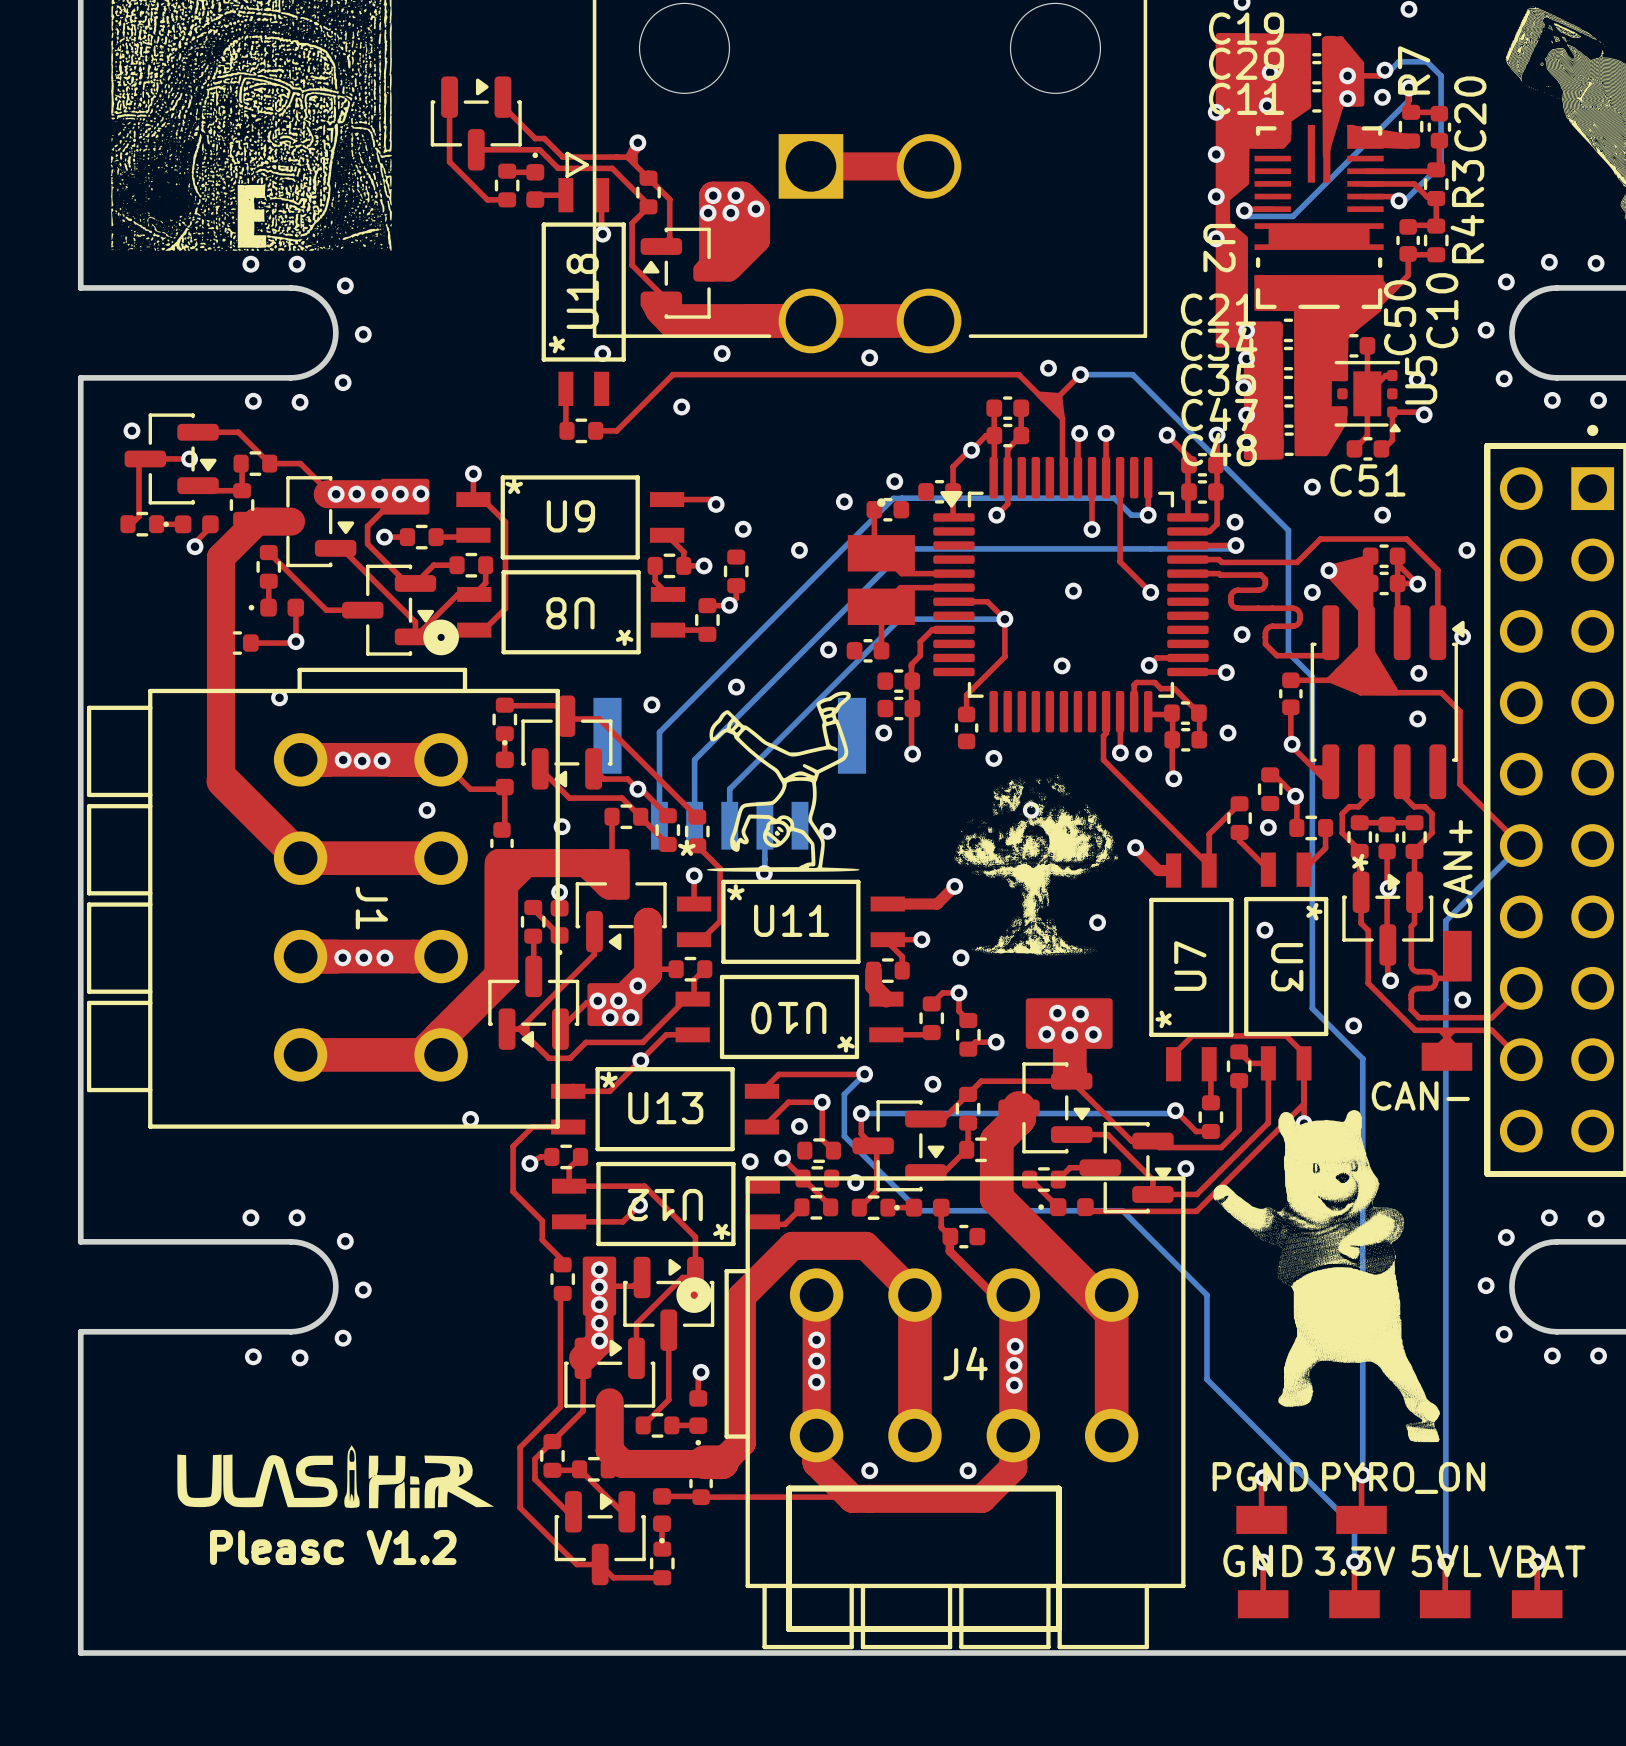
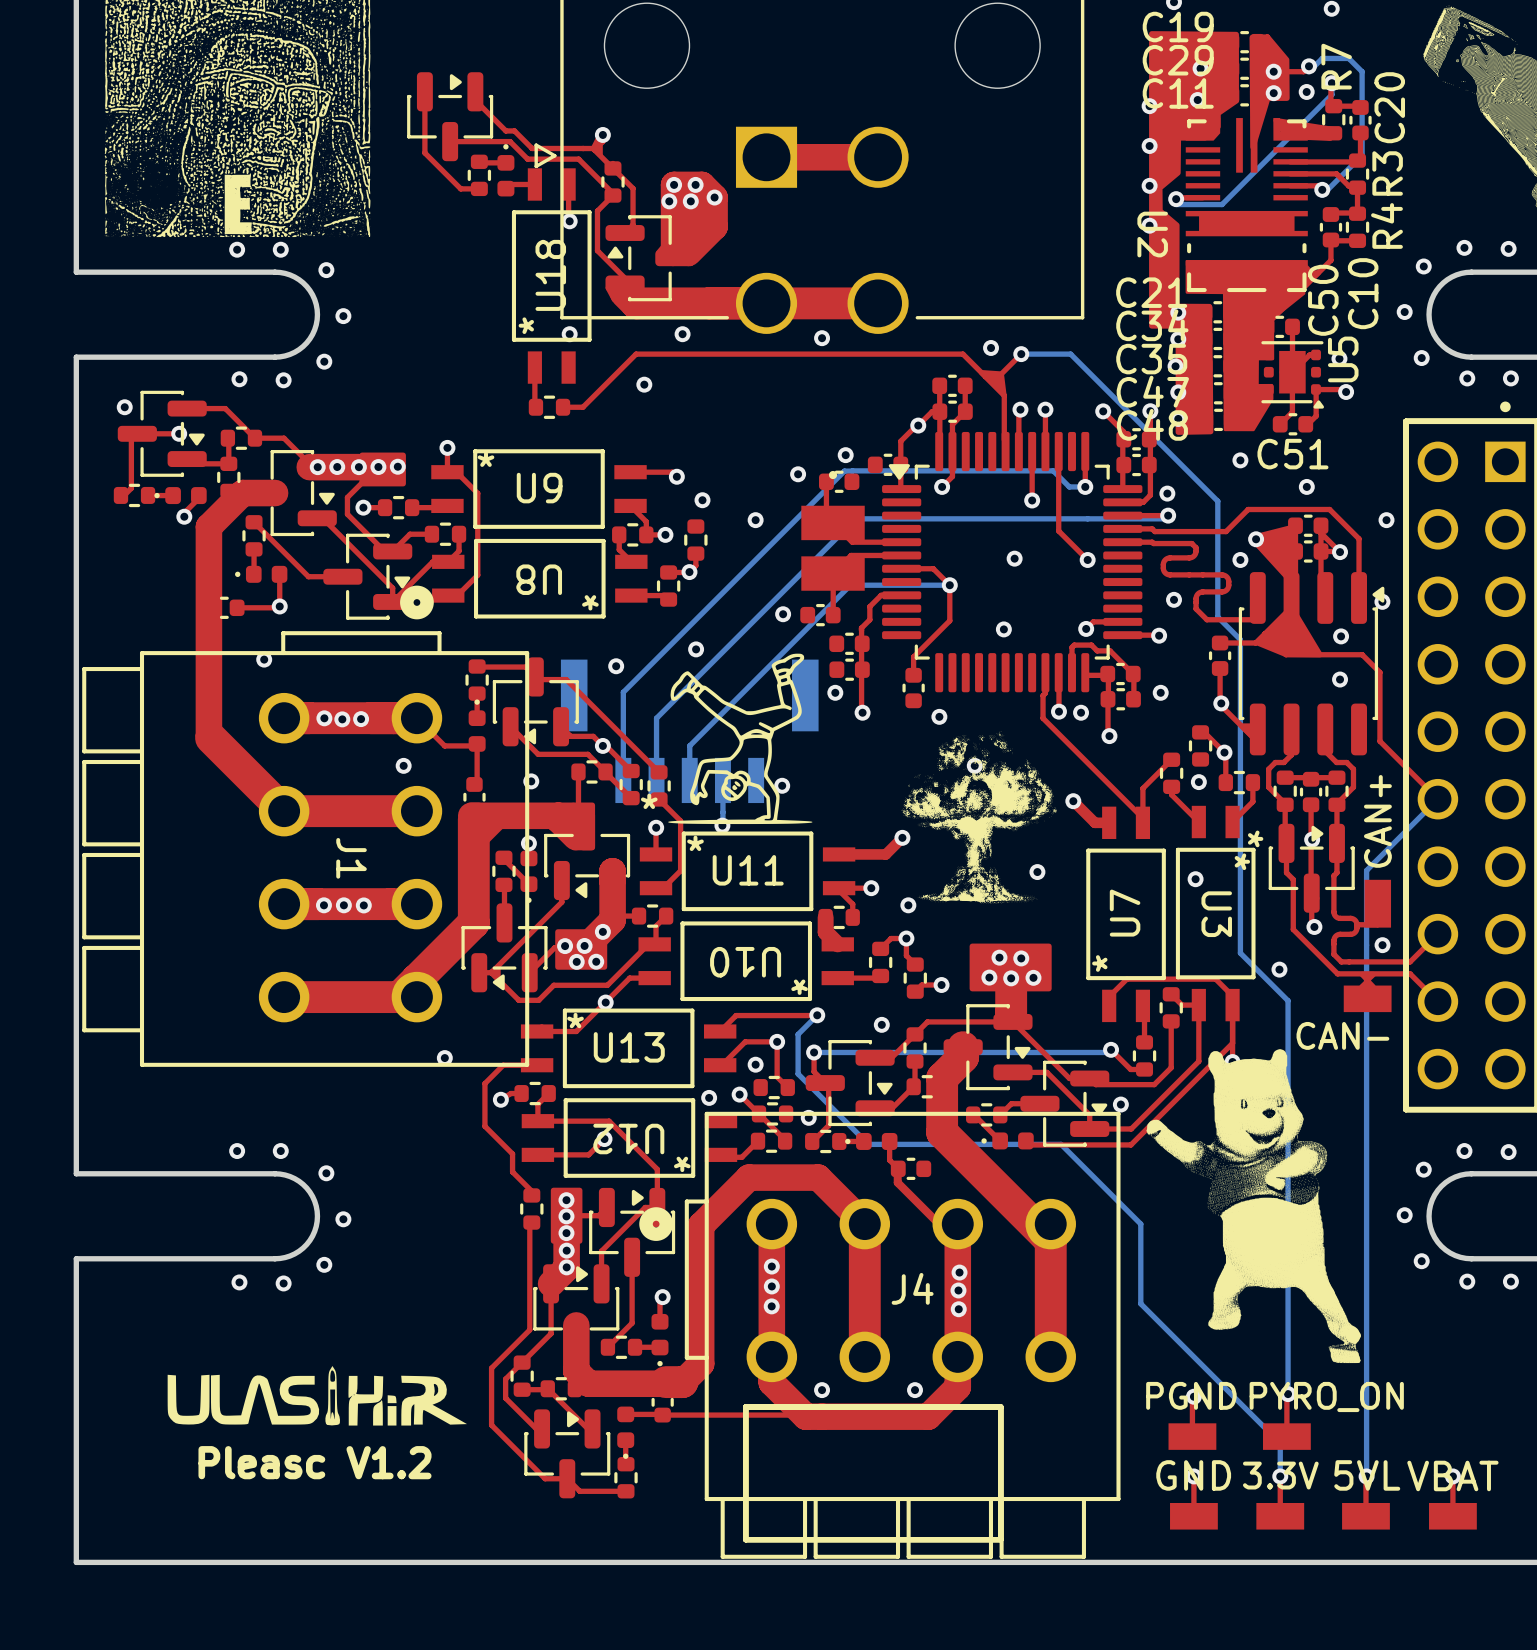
U3 text position: * (1360, 862) -> * (1255, 838)

